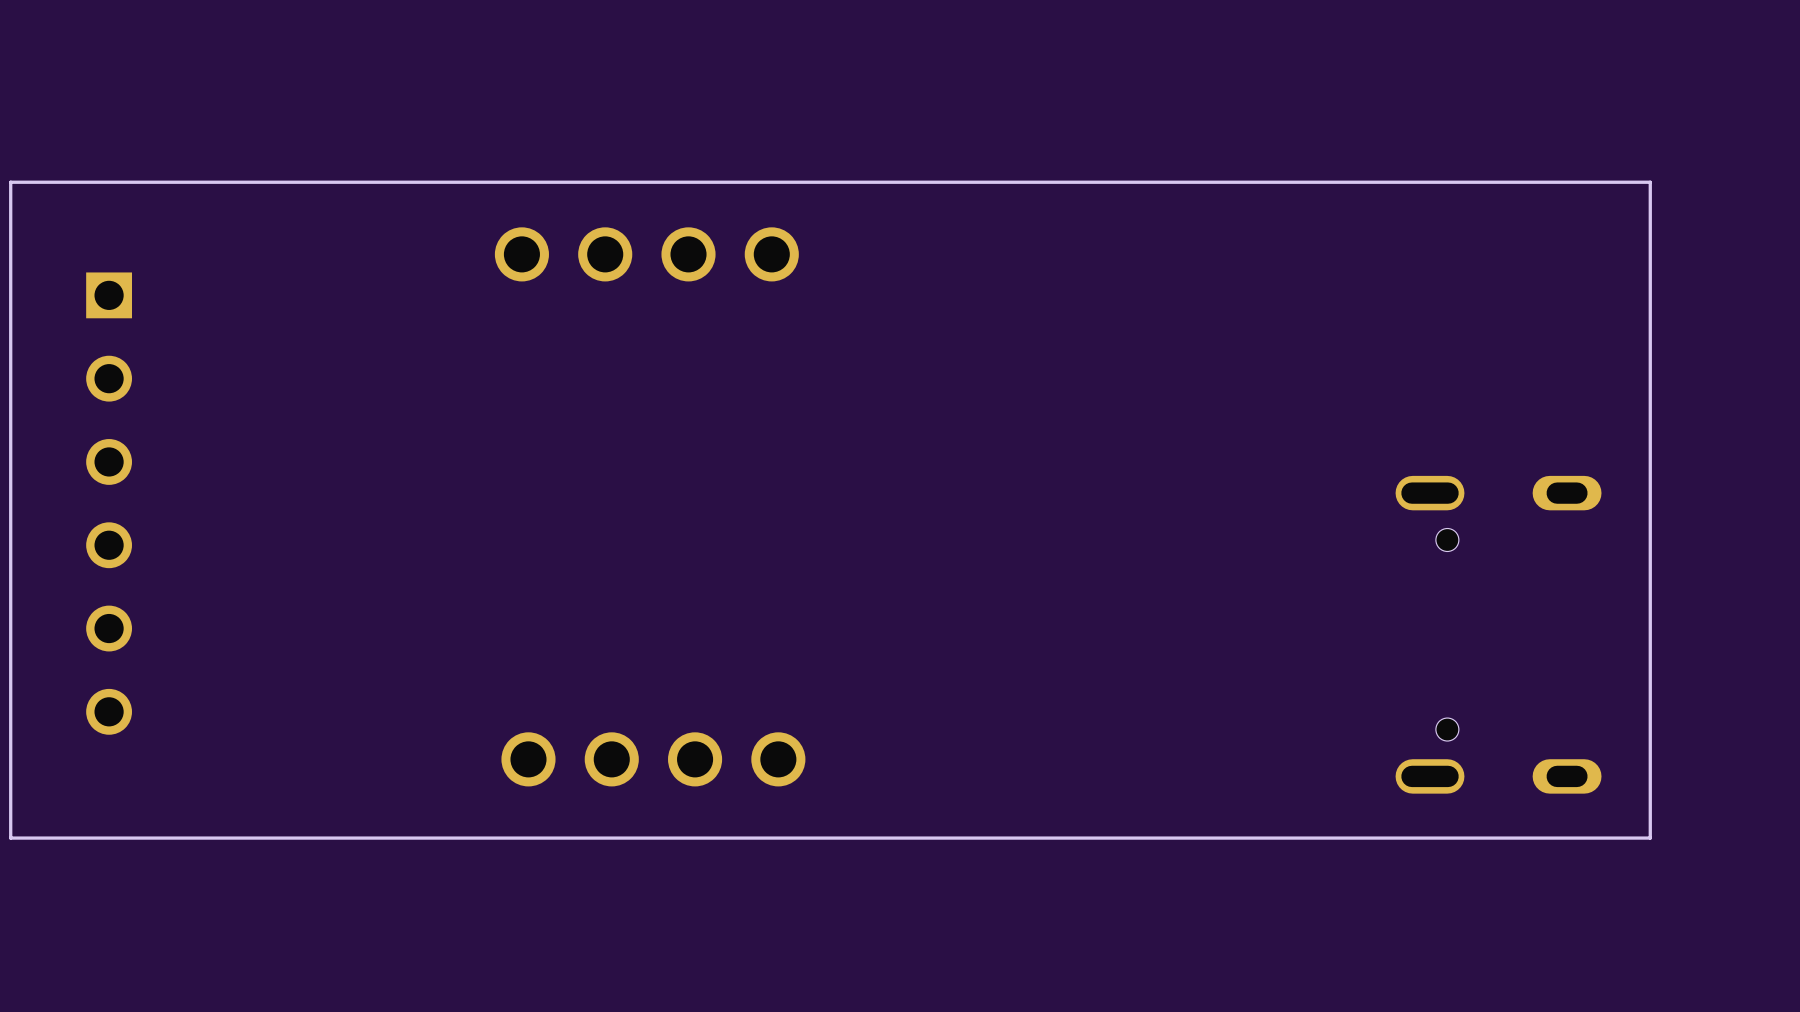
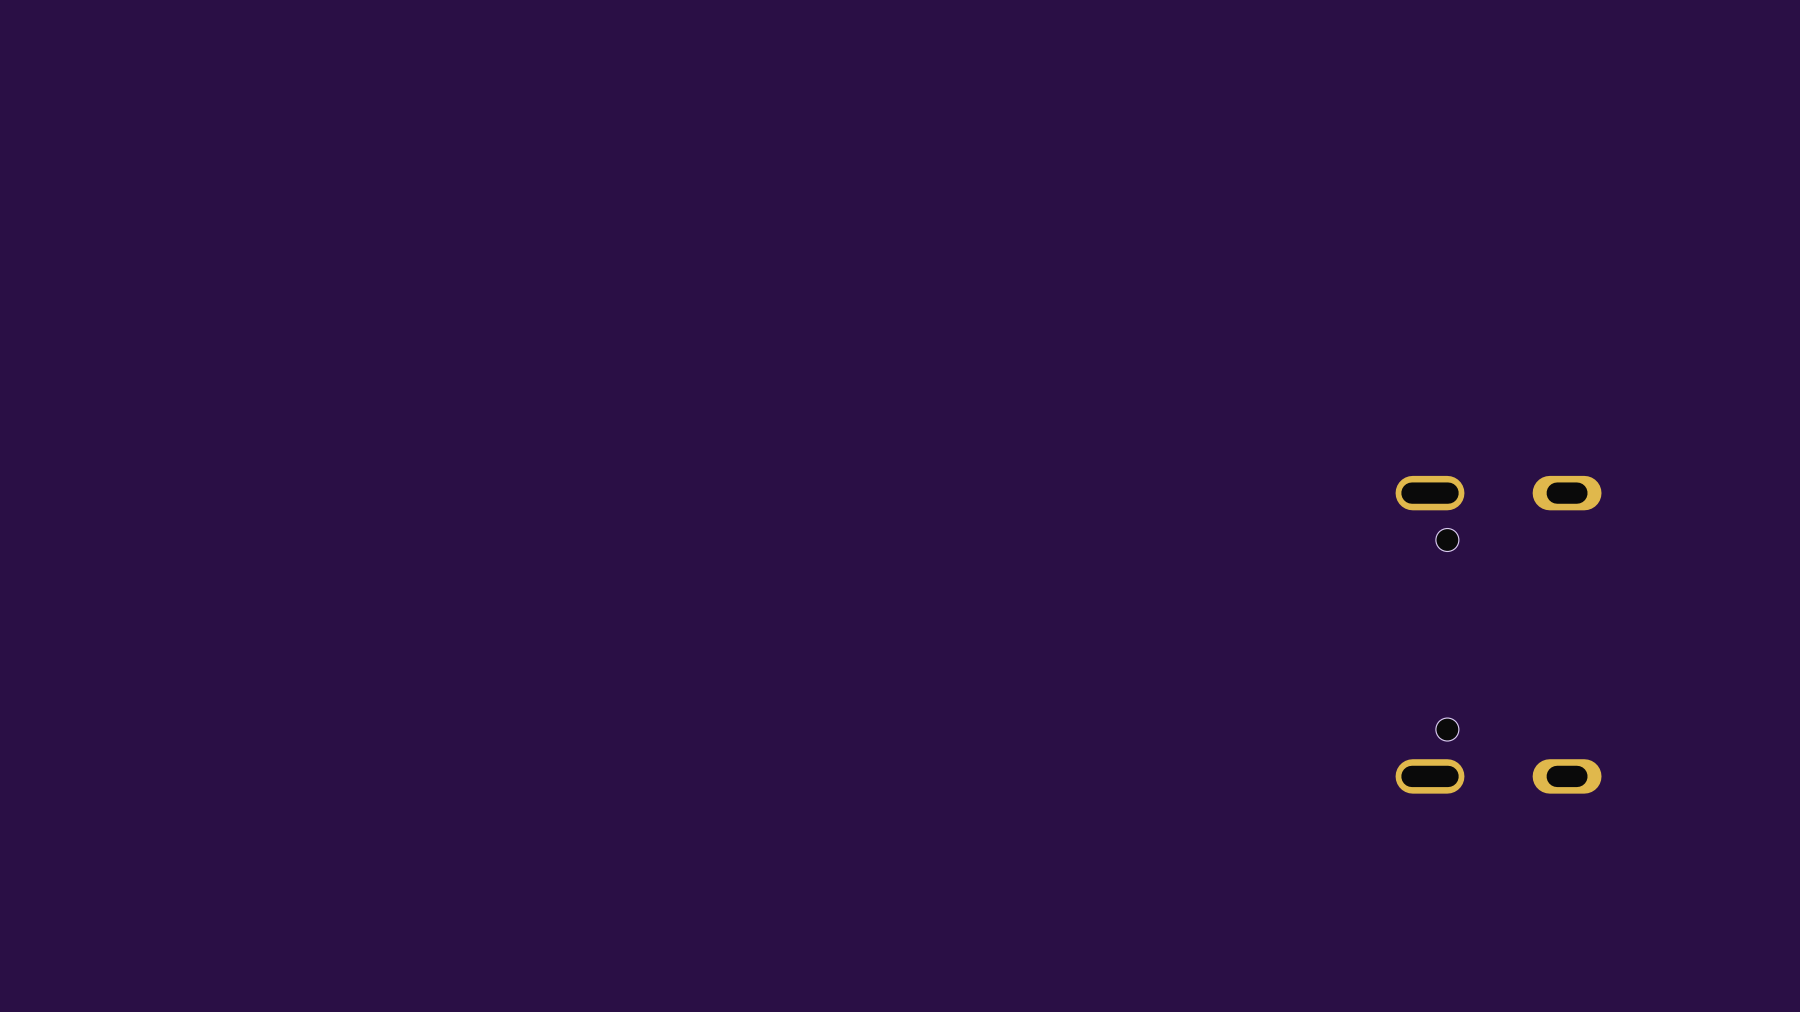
board edge: (1650, 182) (10, 182) (10, 838) (1650, 838) (1650, 182) -> none
part: (646, 254) -> none
part: (109, 503) -> none
part: (653, 759) -> none

